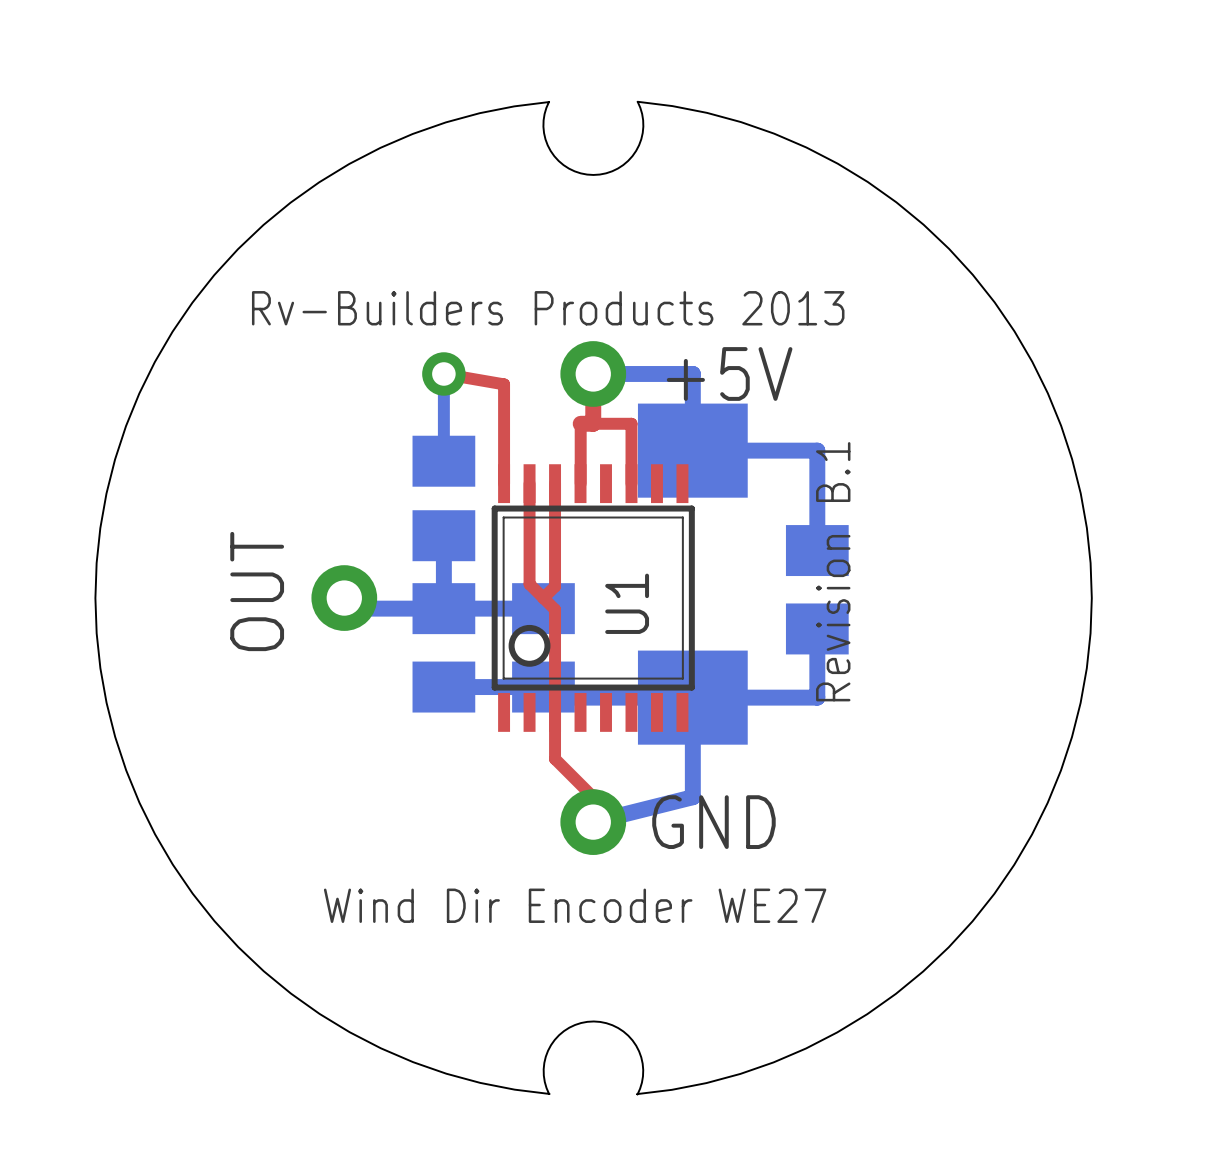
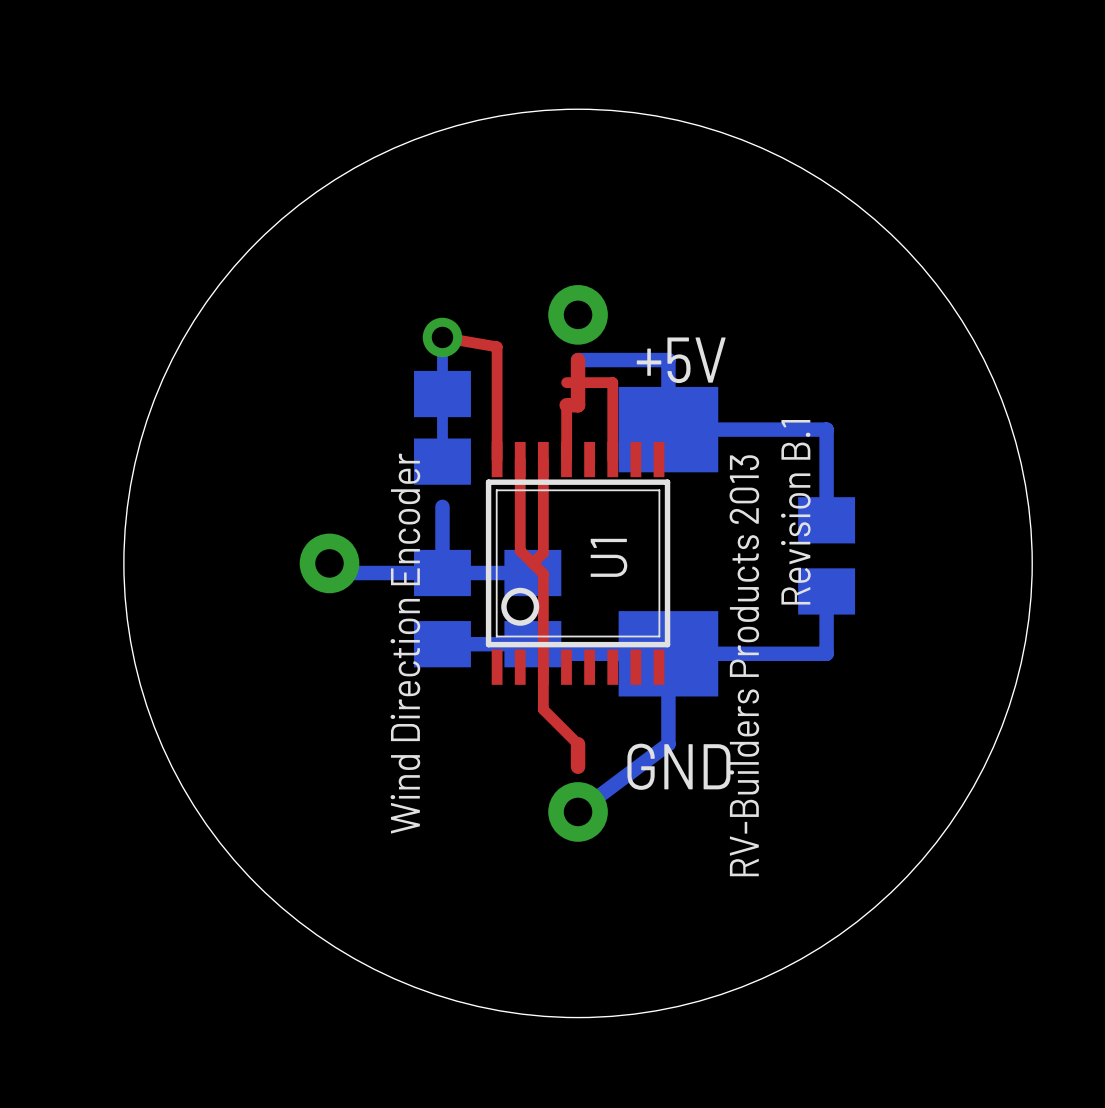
round board edge: none -> [123, 108, 1033, 1019]
board edge: (637, 101) (672, 106) (740, 122) (806, 147) (837, 163) (896, 202) (949, 248) (972, 274) (1014, 331) (1047, 393) (1061, 425) (1080, 493) (1086, 528) (1091, 598) (1086, 668) (1080, 702) (1060, 770) (1032, 834) (994, 893) (972, 921) (948, 947) (896, 993) (837, 1032) (806, 1048) (740, 1073) (671, 1089) (637, 1094) -> none
board edge: (637, 101) (642, 113) (643, 126) (639, 145) (632, 156) (623, 165) (606, 173) (593, 174) (580, 173) (568, 168) (554, 156) (547, 145) (544, 133) (544, 114) (548, 102) (514, 106) (445, 122) (380, 147) (319, 182) (263, 225) (214, 275) (192, 302) (172, 331) (139, 393) (115, 459) (100, 528) (96, 563) (95, 598) (100, 668) (115, 736) (139, 802) (155, 834) (192, 893) (214, 921) (238, 947) (290, 993) (319, 1013) (380, 1048) (413, 1062) (480, 1082) (549, 1093) -> none
text: Rv-Builders Products 2013 (548, 308) -> RV-Builders Products 2013 (744, 665)
part: none -> (578, 314)
top track: (443, 373) (504, 384) -> (442, 337) (497, 346) (497, 369)
via position: (443, 373) -> (442, 337)
part: (593, 373) -> none
top track: (593, 423) (631, 423) -> (566, 382) (612, 382) (612, 405)
bottom track: (817, 450) (817, 550) -> (781, 429) (826, 429) (826, 520)
part position: (443, 498) -> (442, 427)
part footprint: [311, 565, 378, 631] -> [299, 533, 360, 594]
part position: (817, 589) -> (826, 555)
text: OUT (257, 591) -> none
bottom track: (817, 628) (817, 697) -> (826, 591) (826, 653) (781, 653)
bottom track: (692, 797) (593, 822) -> (668, 744) (578, 811)
part: (593, 822) -> none
part: none -> (578, 811)
text: Wind Dir Encoder WE27 (575, 905) -> Wind Direction Encoder (405, 643)
board edge: (549, 1093) (544, 1081) (543, 1069) (545, 1056) (551, 1045) (559, 1035) (569, 1027) (581, 1023) (593, 1021) (606, 1023) (618, 1028) (628, 1035) (636, 1045) (641, 1057) (643, 1069) (641, 1082) (637, 1094) -> none

